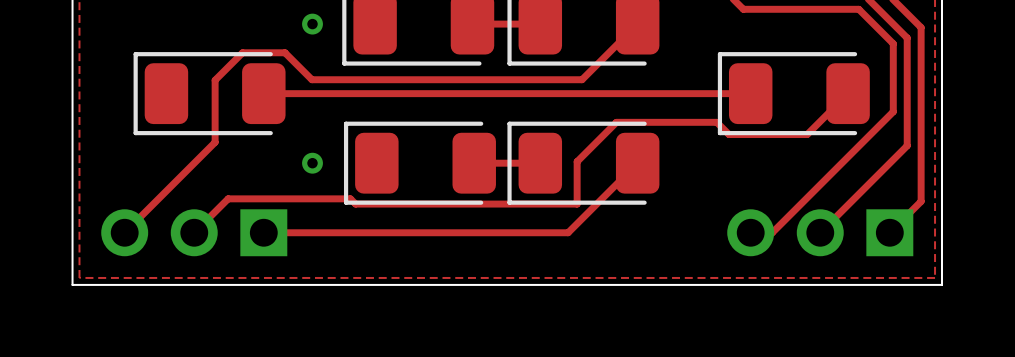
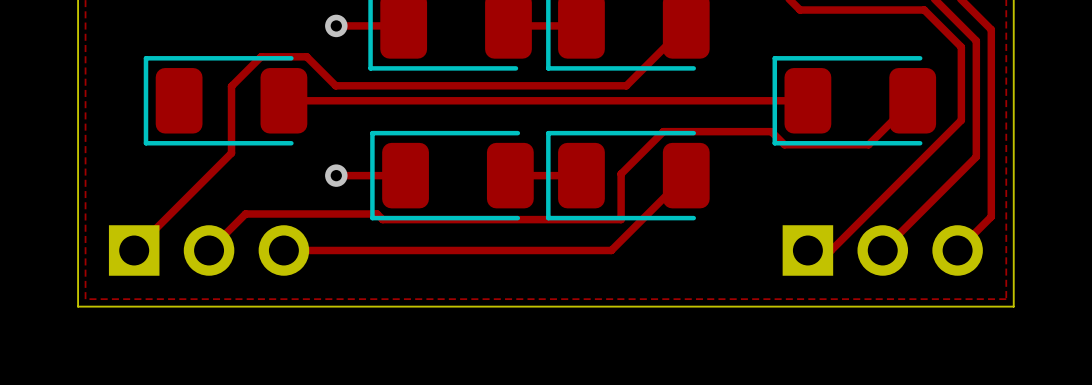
track: none -> (336, 25) (403, 25)
track: none -> (336, 175) (405, 175)
part rotation: 0° (194, 232) -> 180° (209, 250)
part rotation: 0° (820, 232) -> 180° (882, 250)

